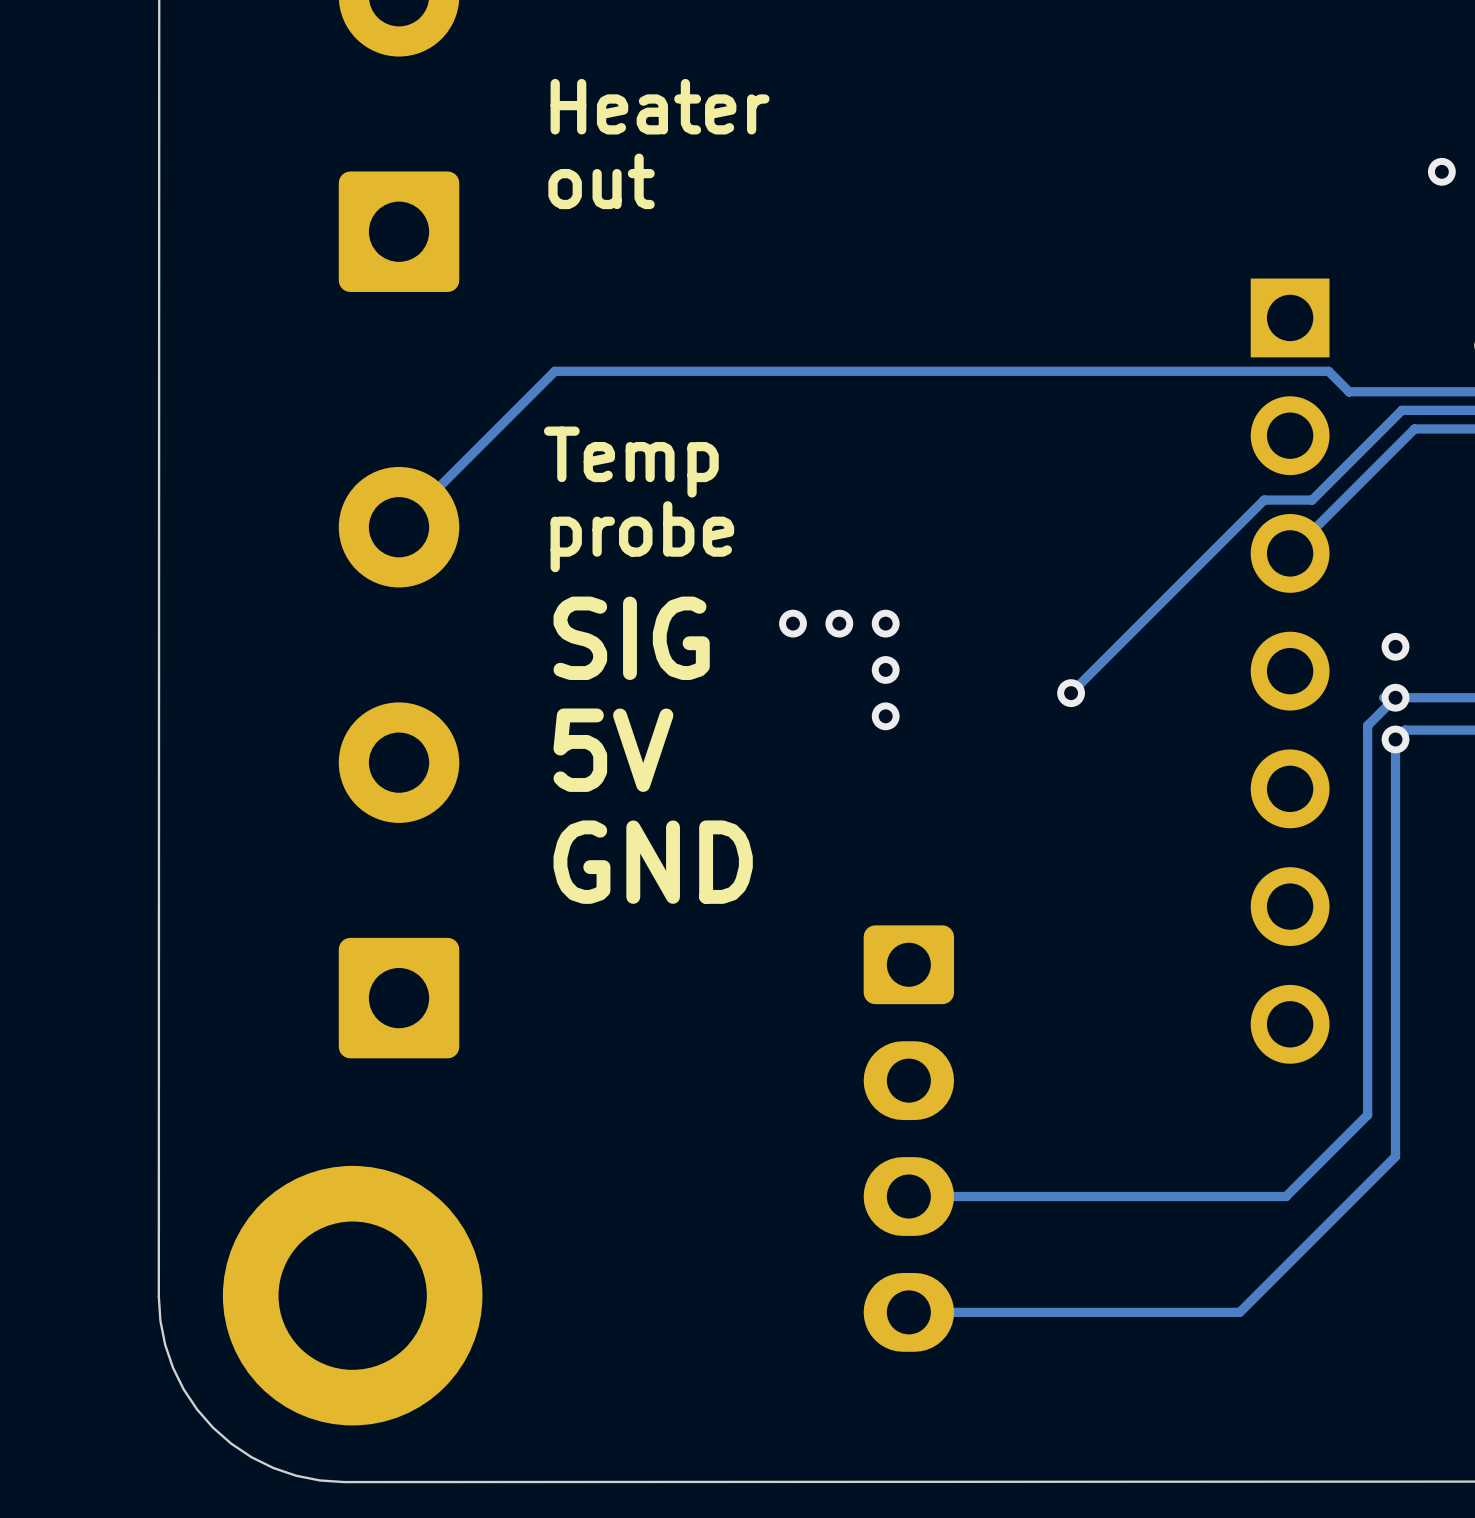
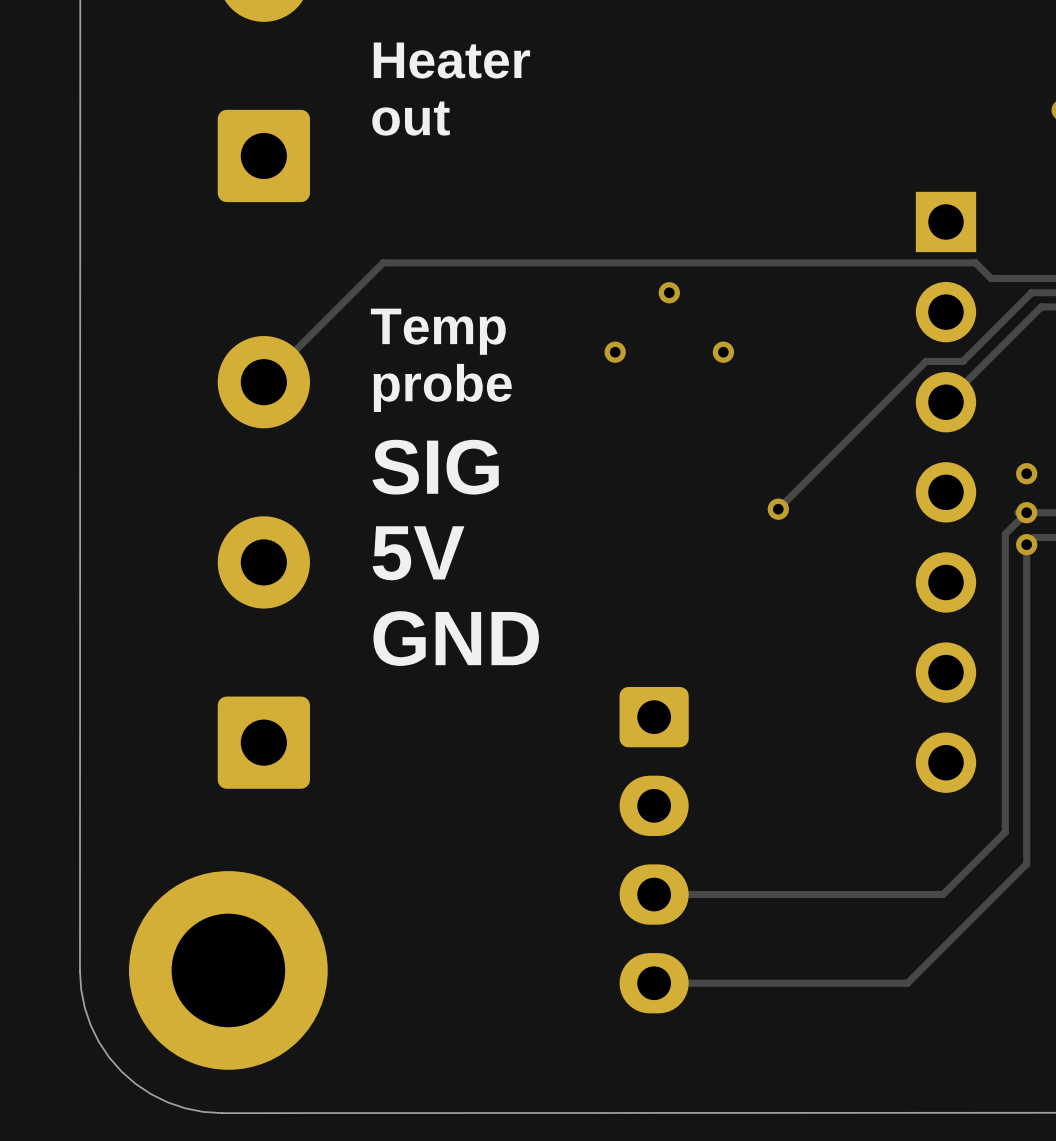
via: none -> (669, 292)
via: none -> (615, 352)
via: none -> (723, 352)
via: (792, 623) -> none
via: (839, 623) -> none
via: (885, 623) -> none
via: (885, 669) -> none
via: (885, 716) -> none

